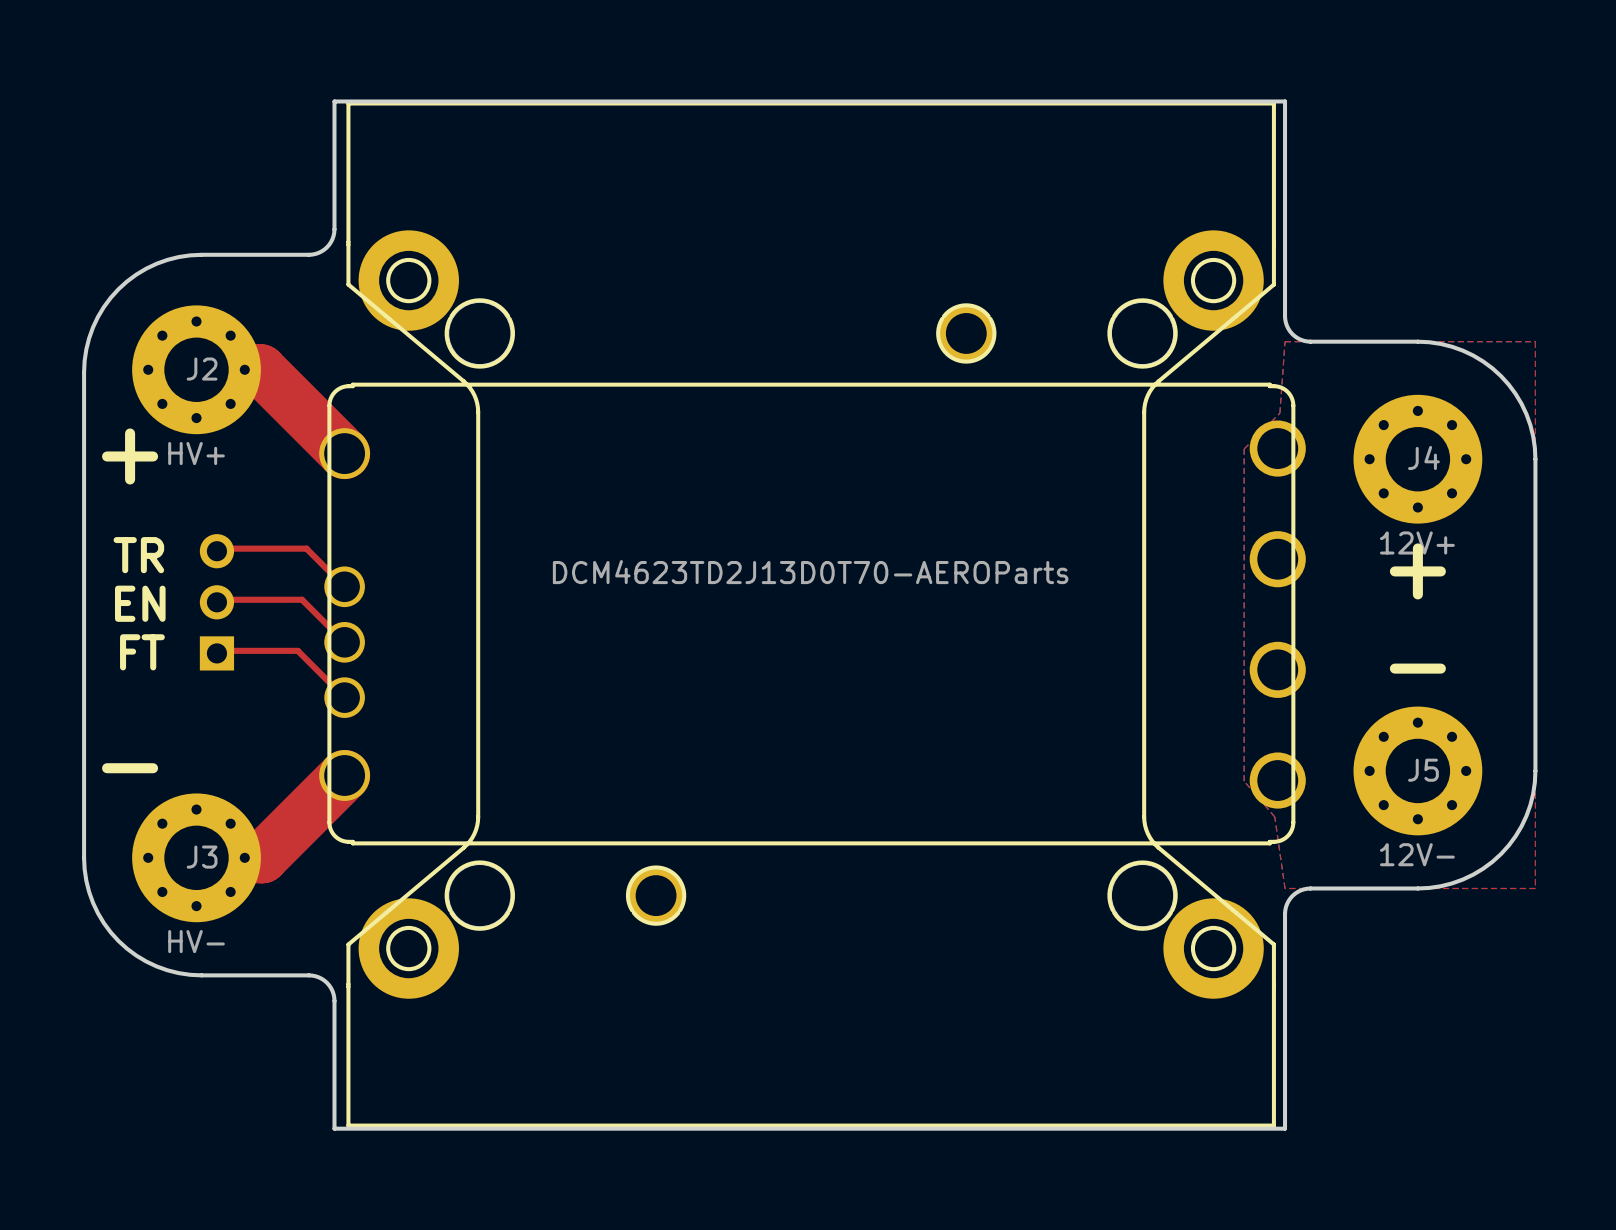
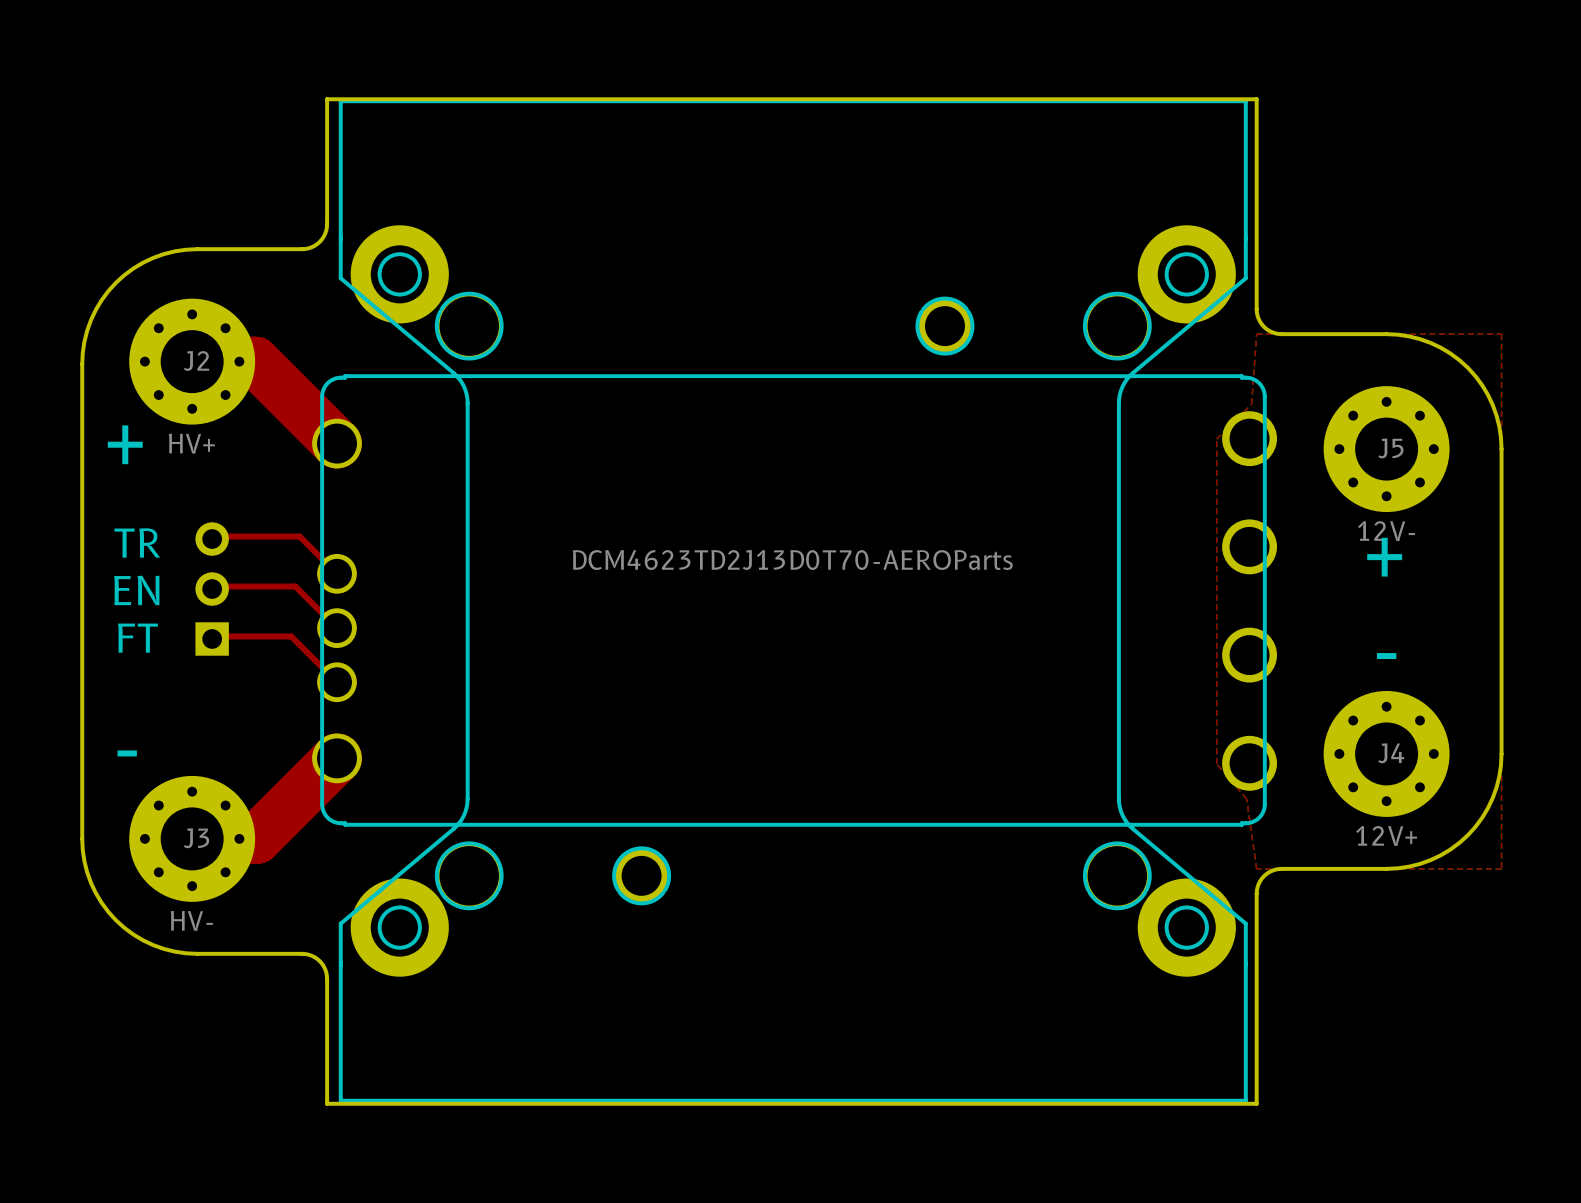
J4 name: J4 (1423, 457) -> J5 (1390, 448)
J4 value: 12V+ (1417, 542) -> 12V- (1386, 531)
J5 name: J5 (1423, 770) -> J4 (1391, 753)
J5 value: 12V- (1417, 854) -> 12V+ (1386, 835)

